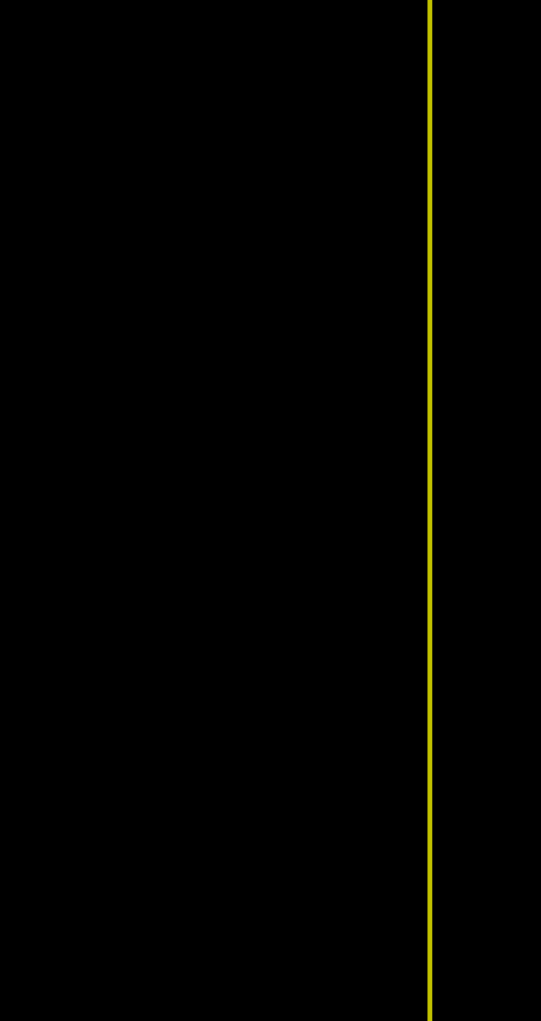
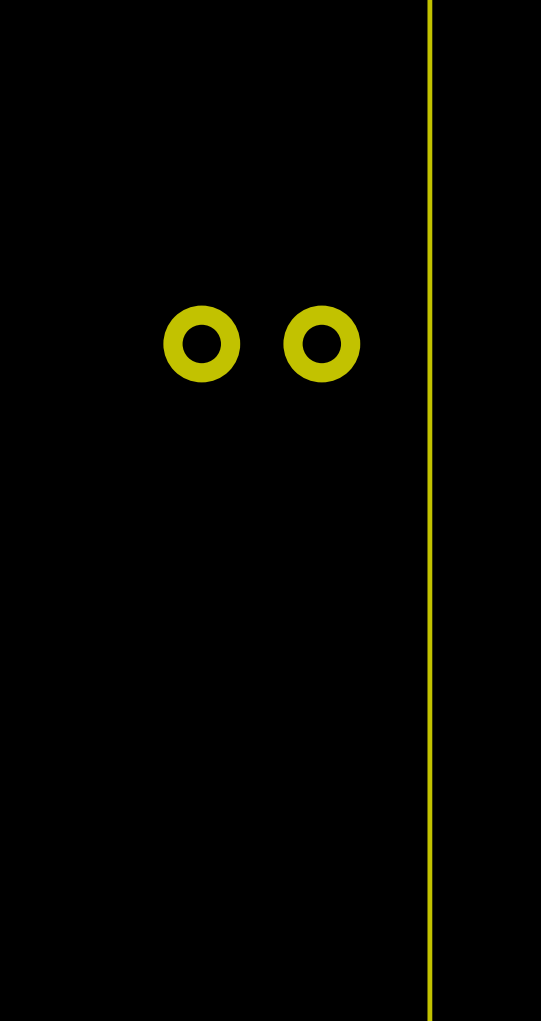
part: none -> (261, 343)

